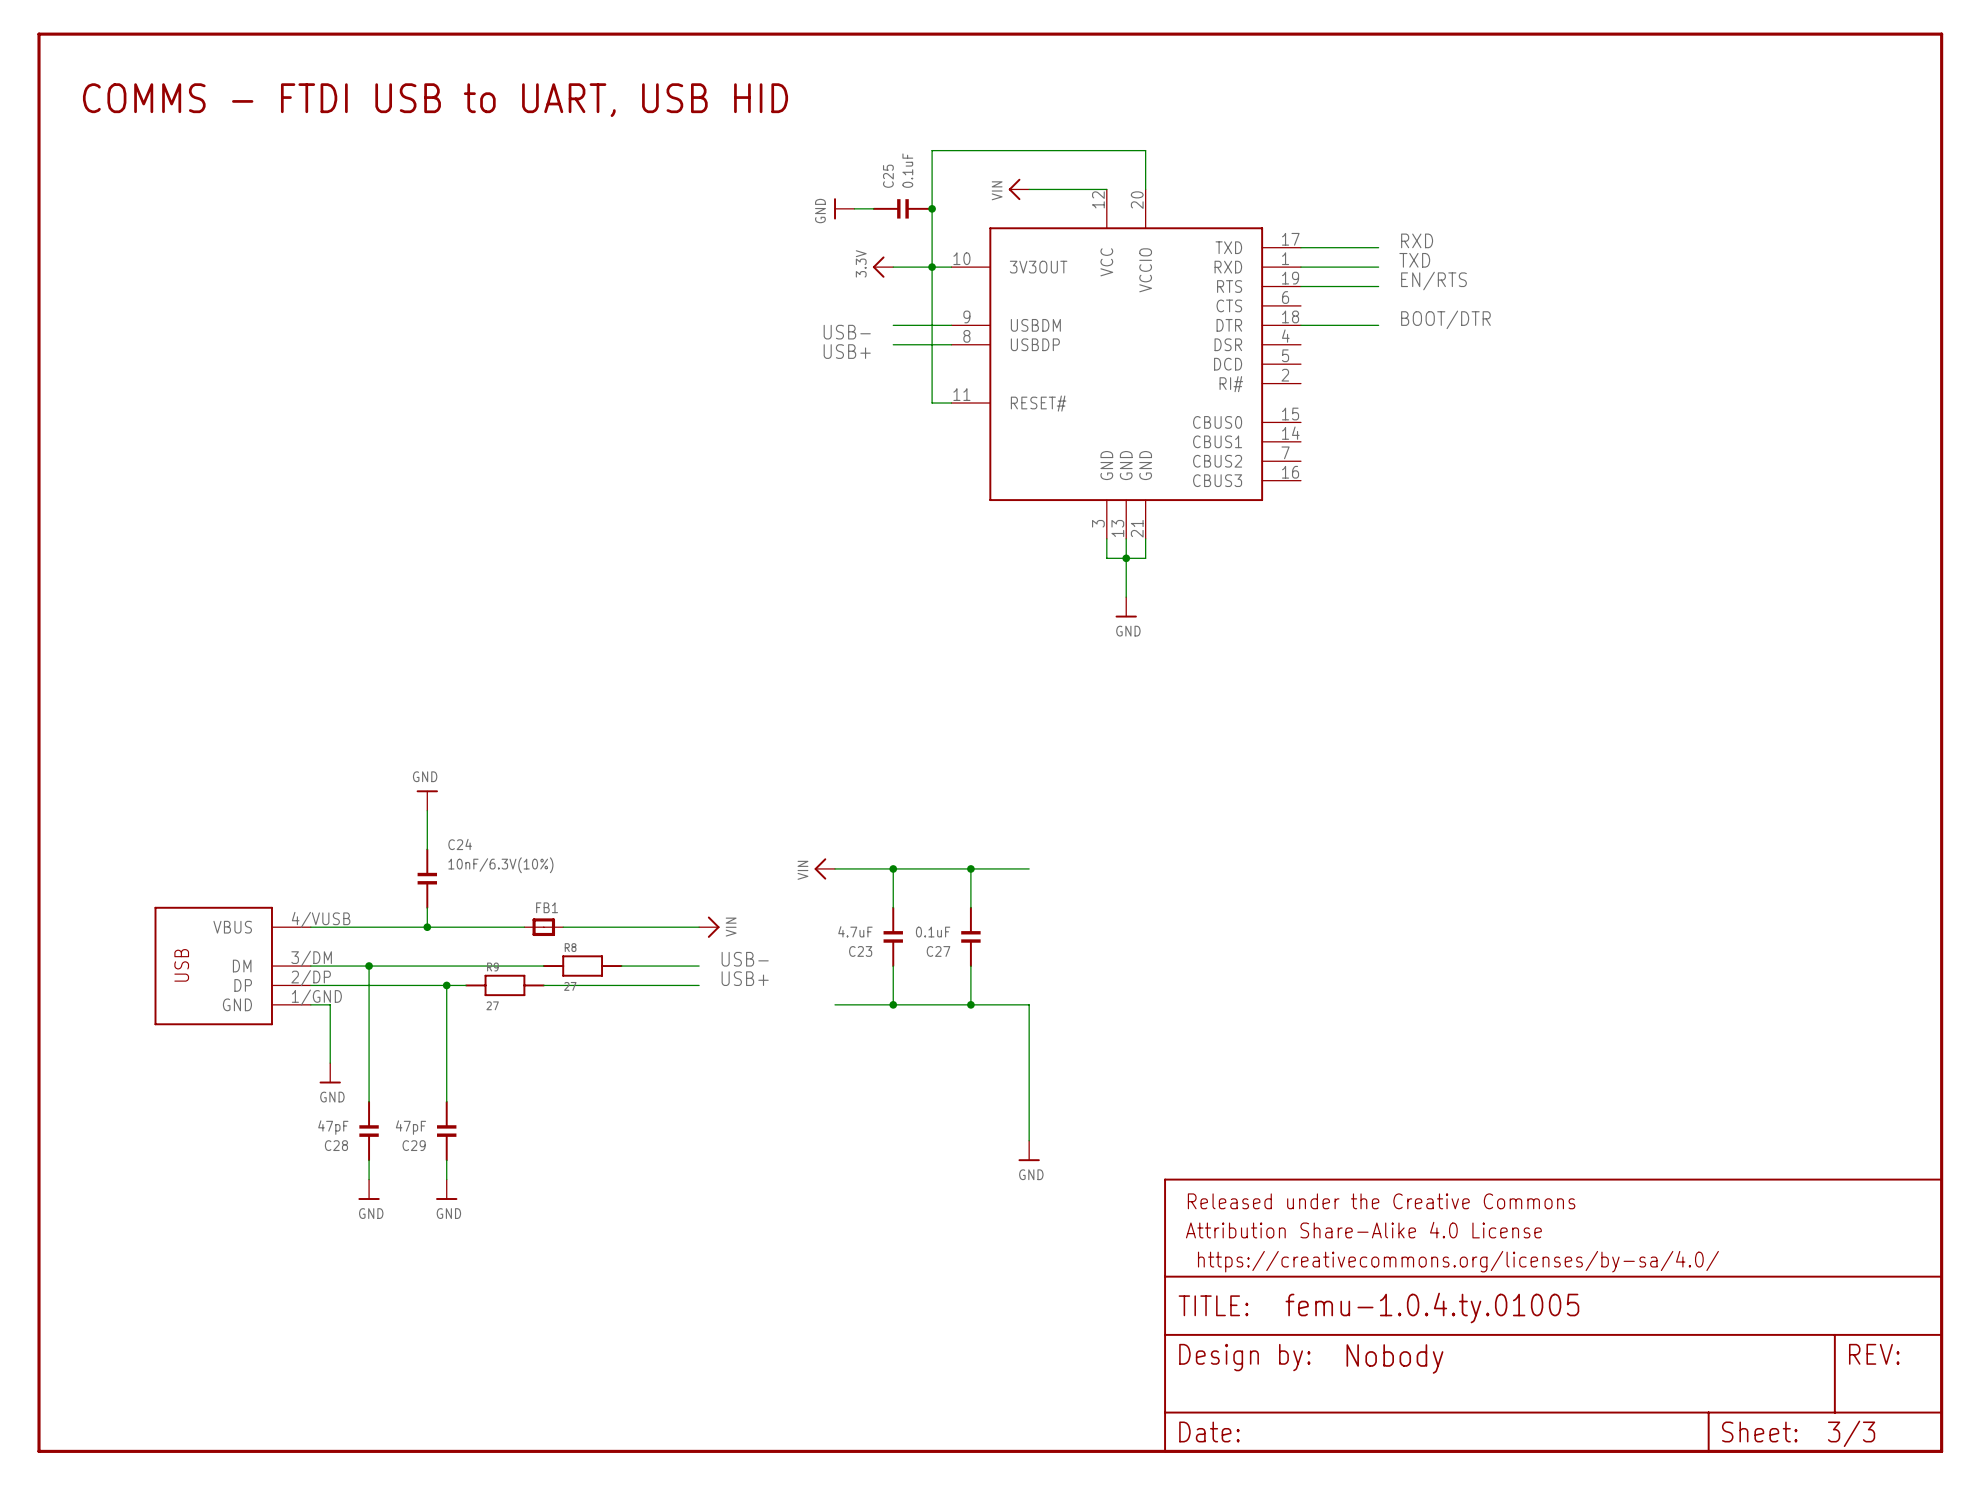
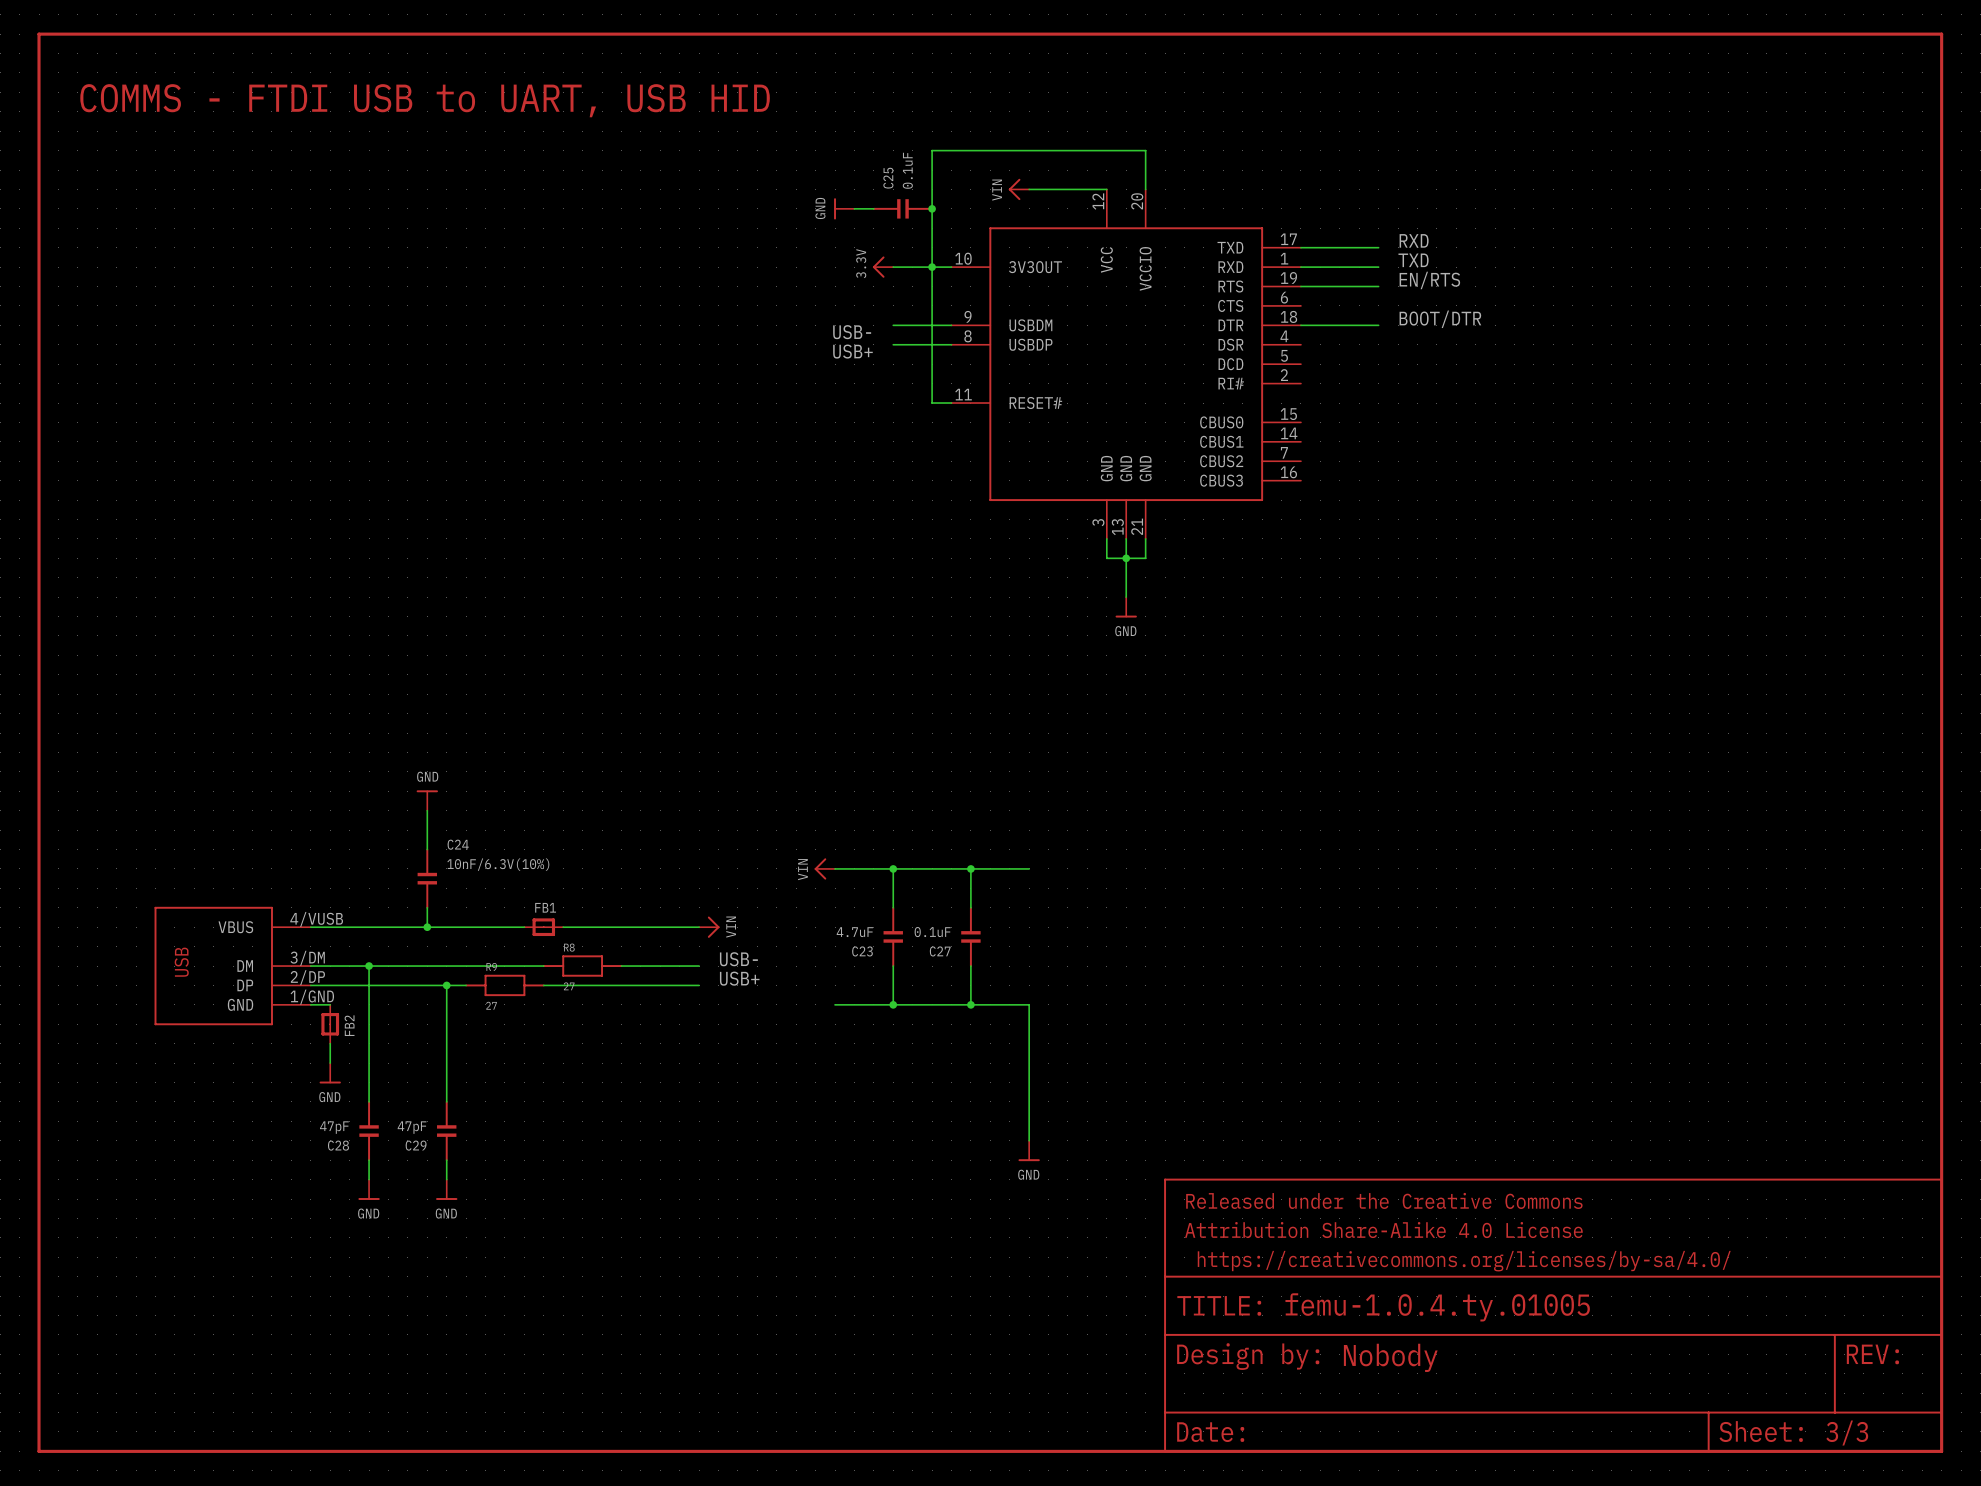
FB2: none -> (330, 1024)

